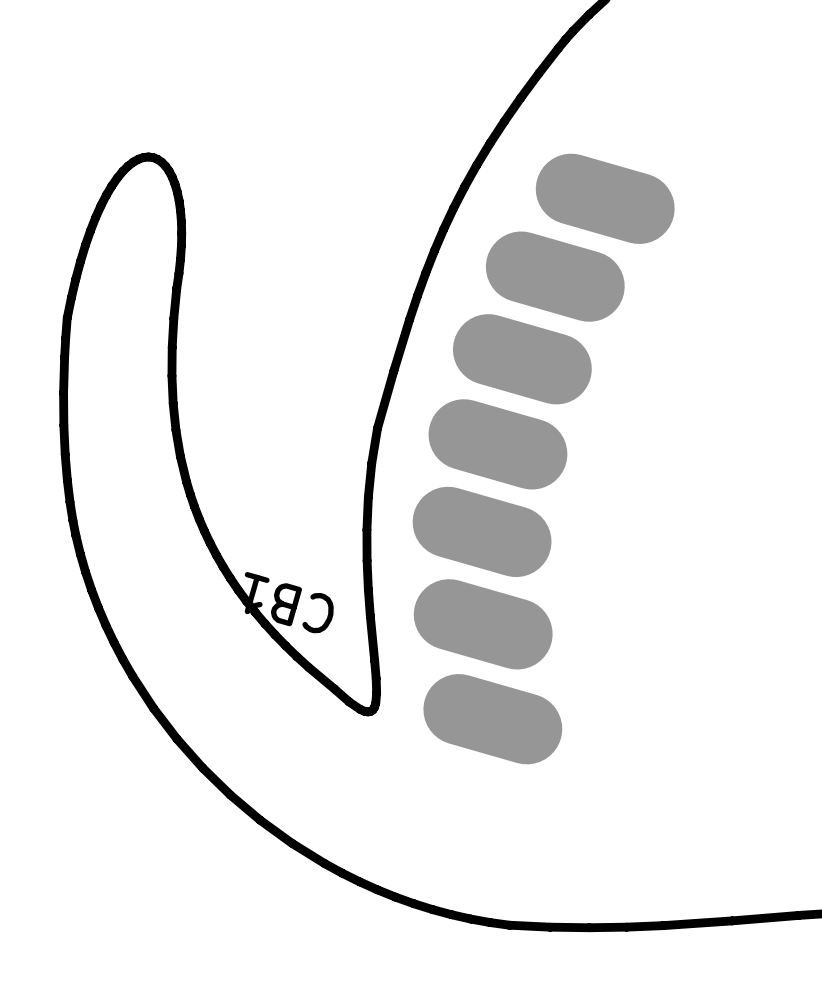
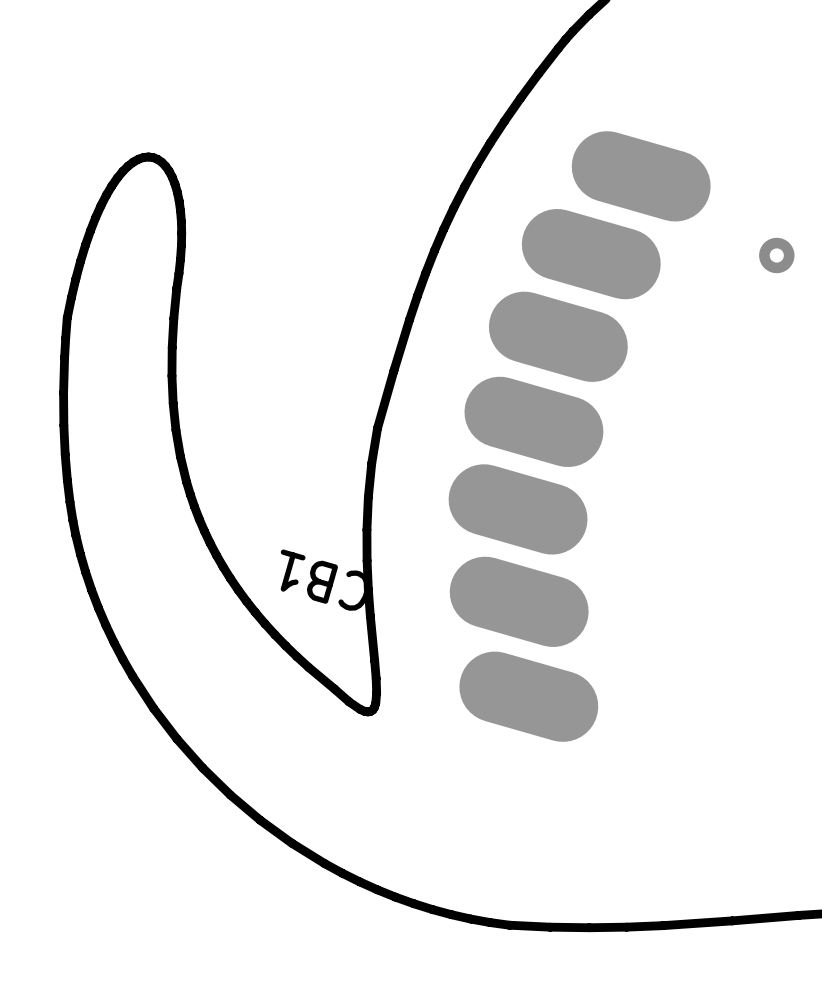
via: none -> (776, 255)
CB1 position: (543, 459) -> (579, 436)

